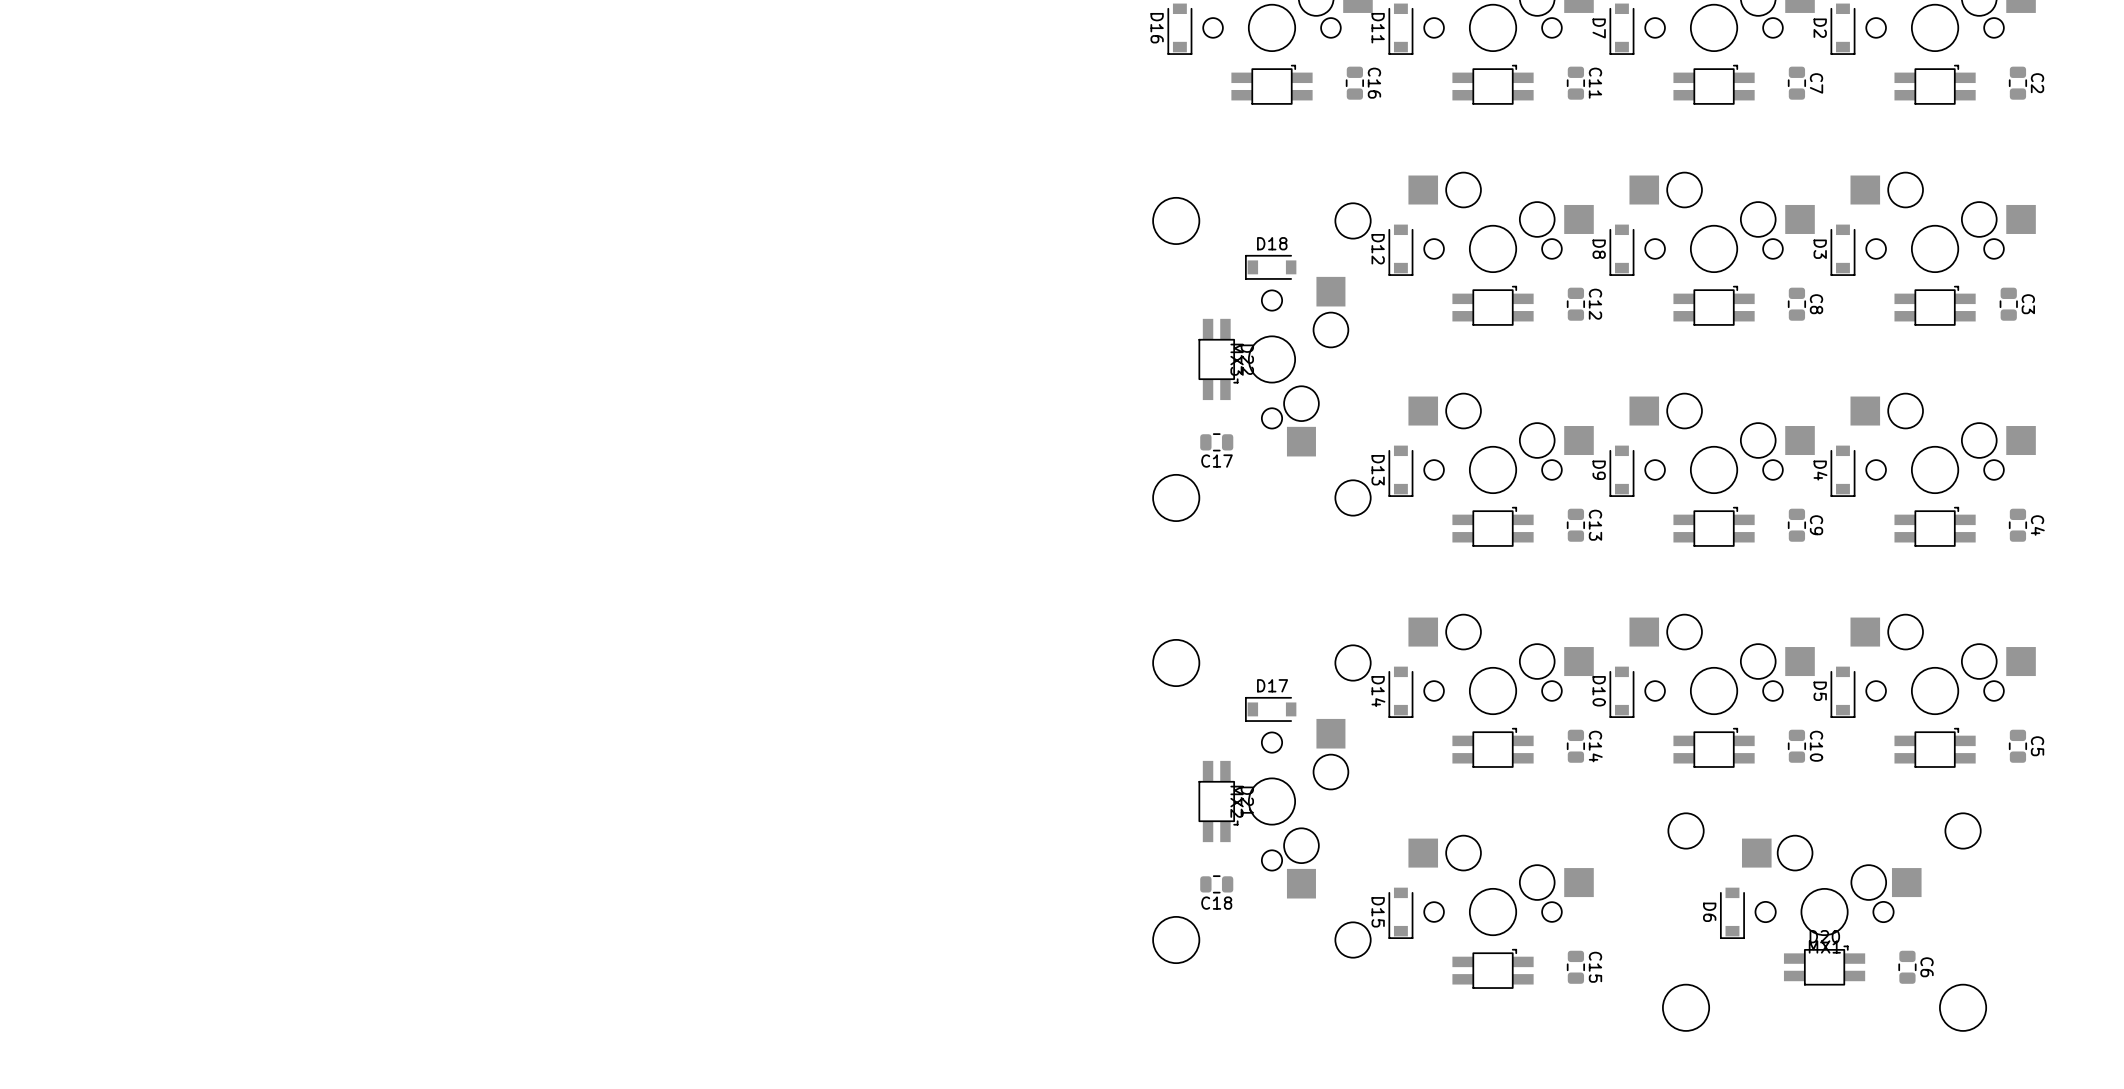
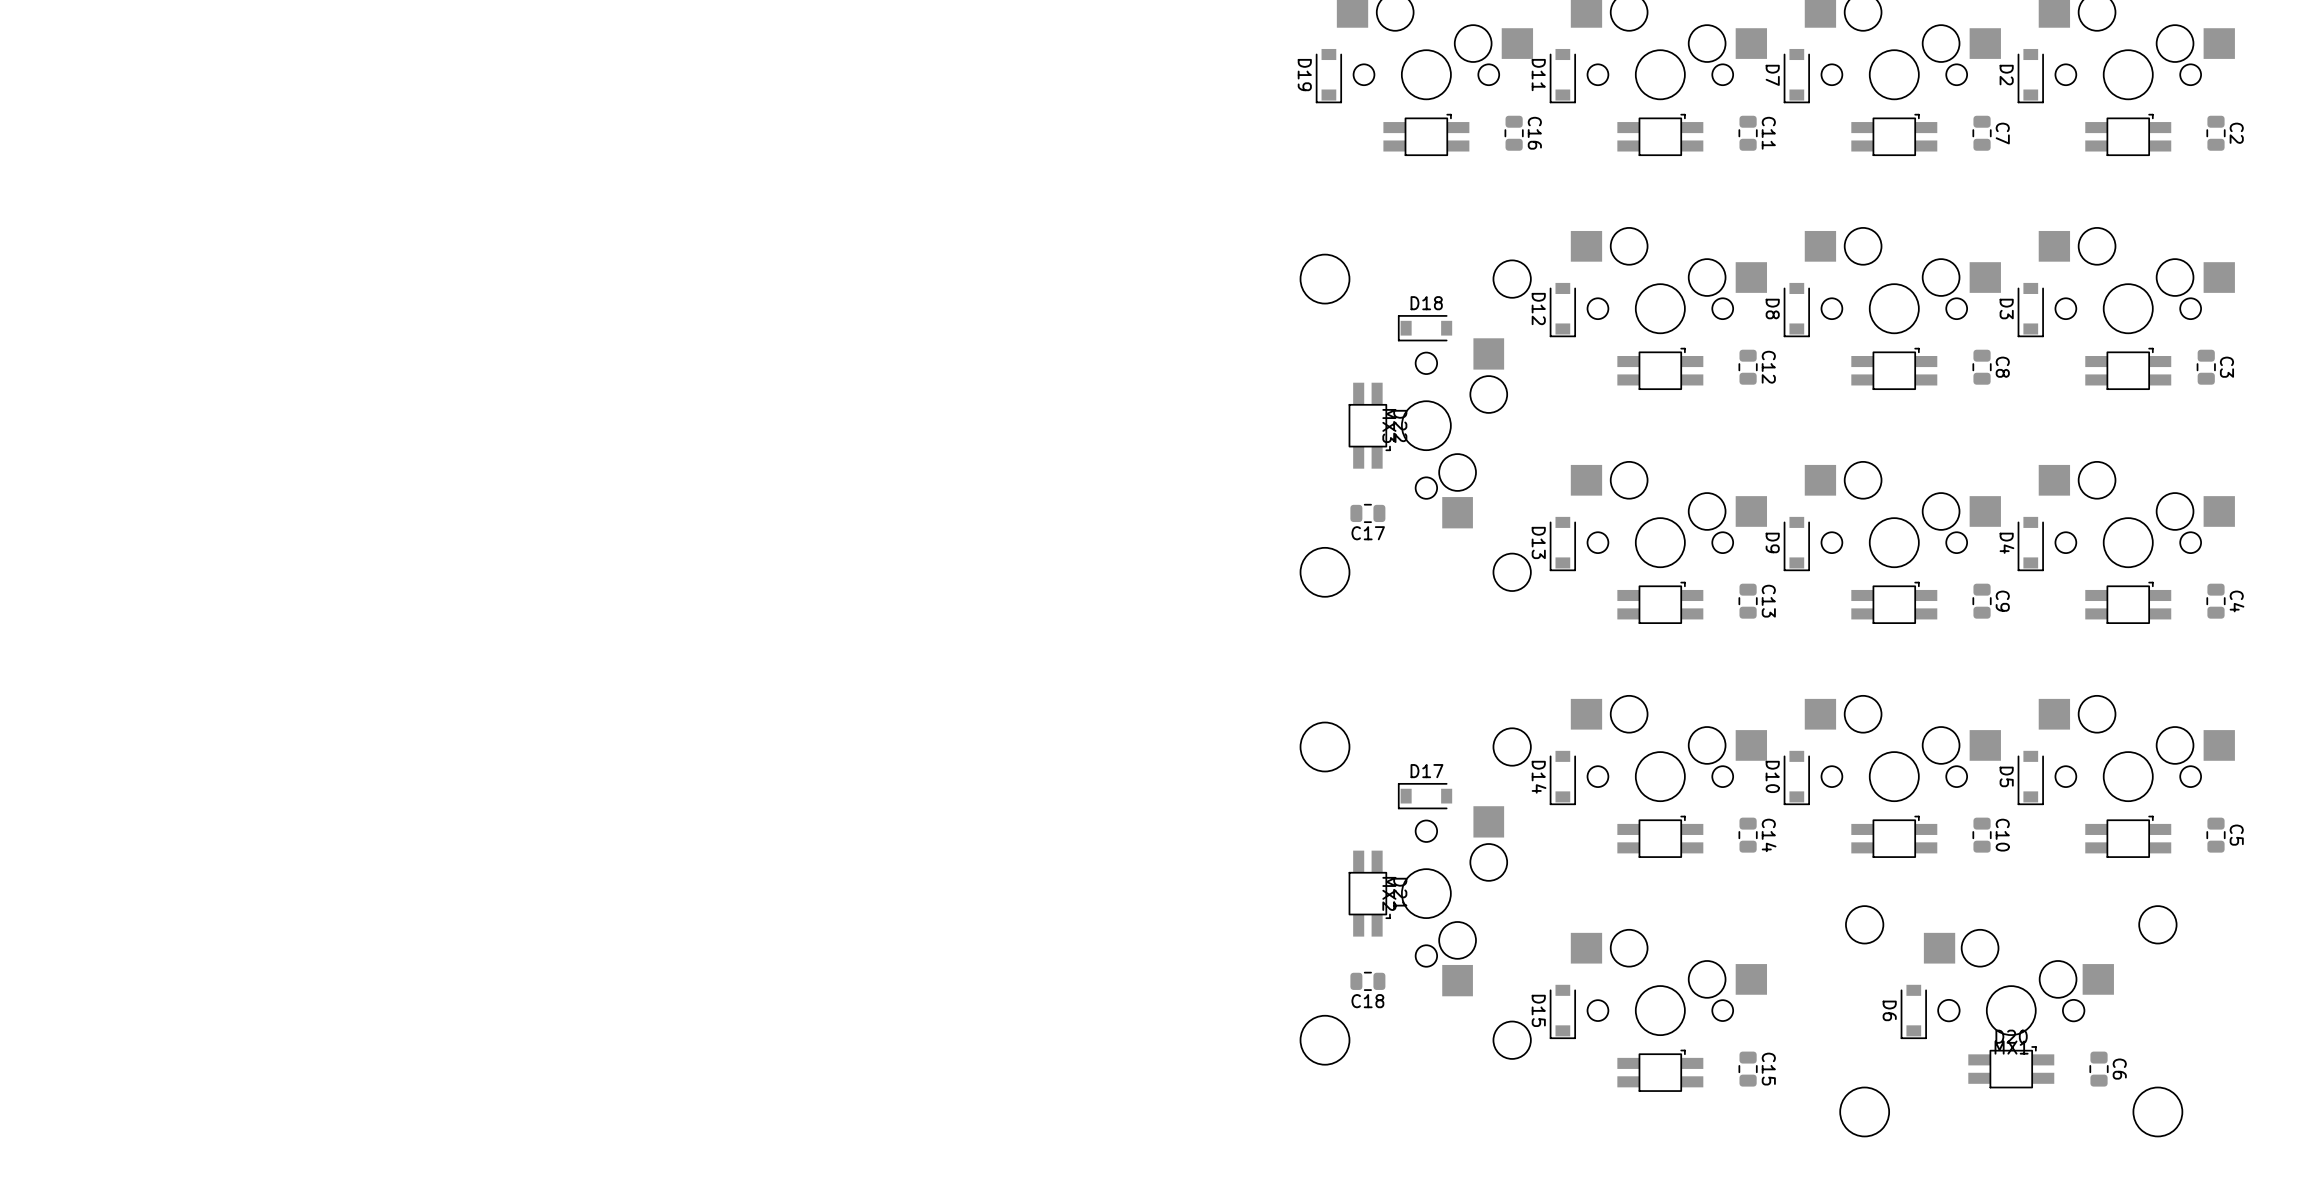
D16 name: D16 (1157, 28) -> D19 (1304, 75)

